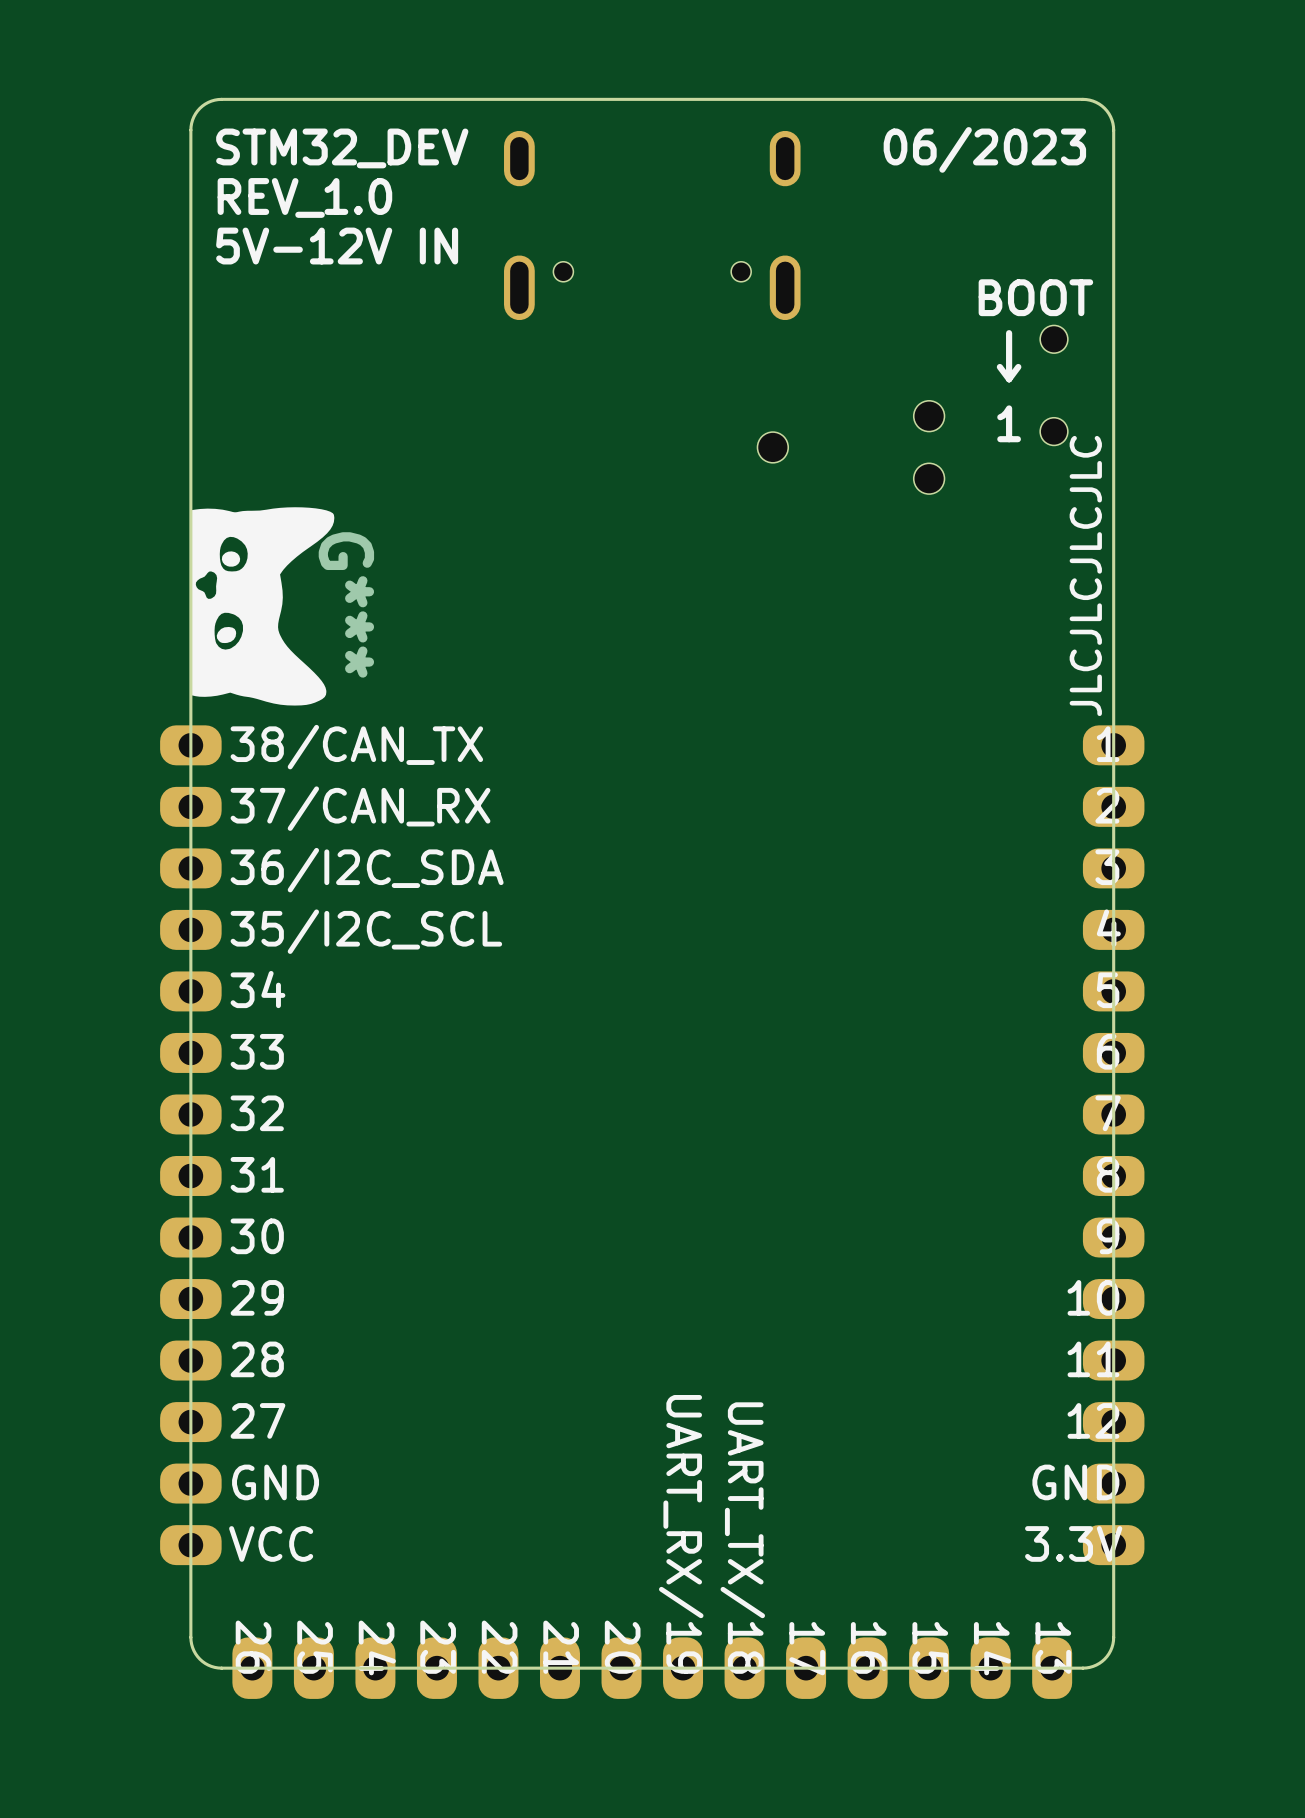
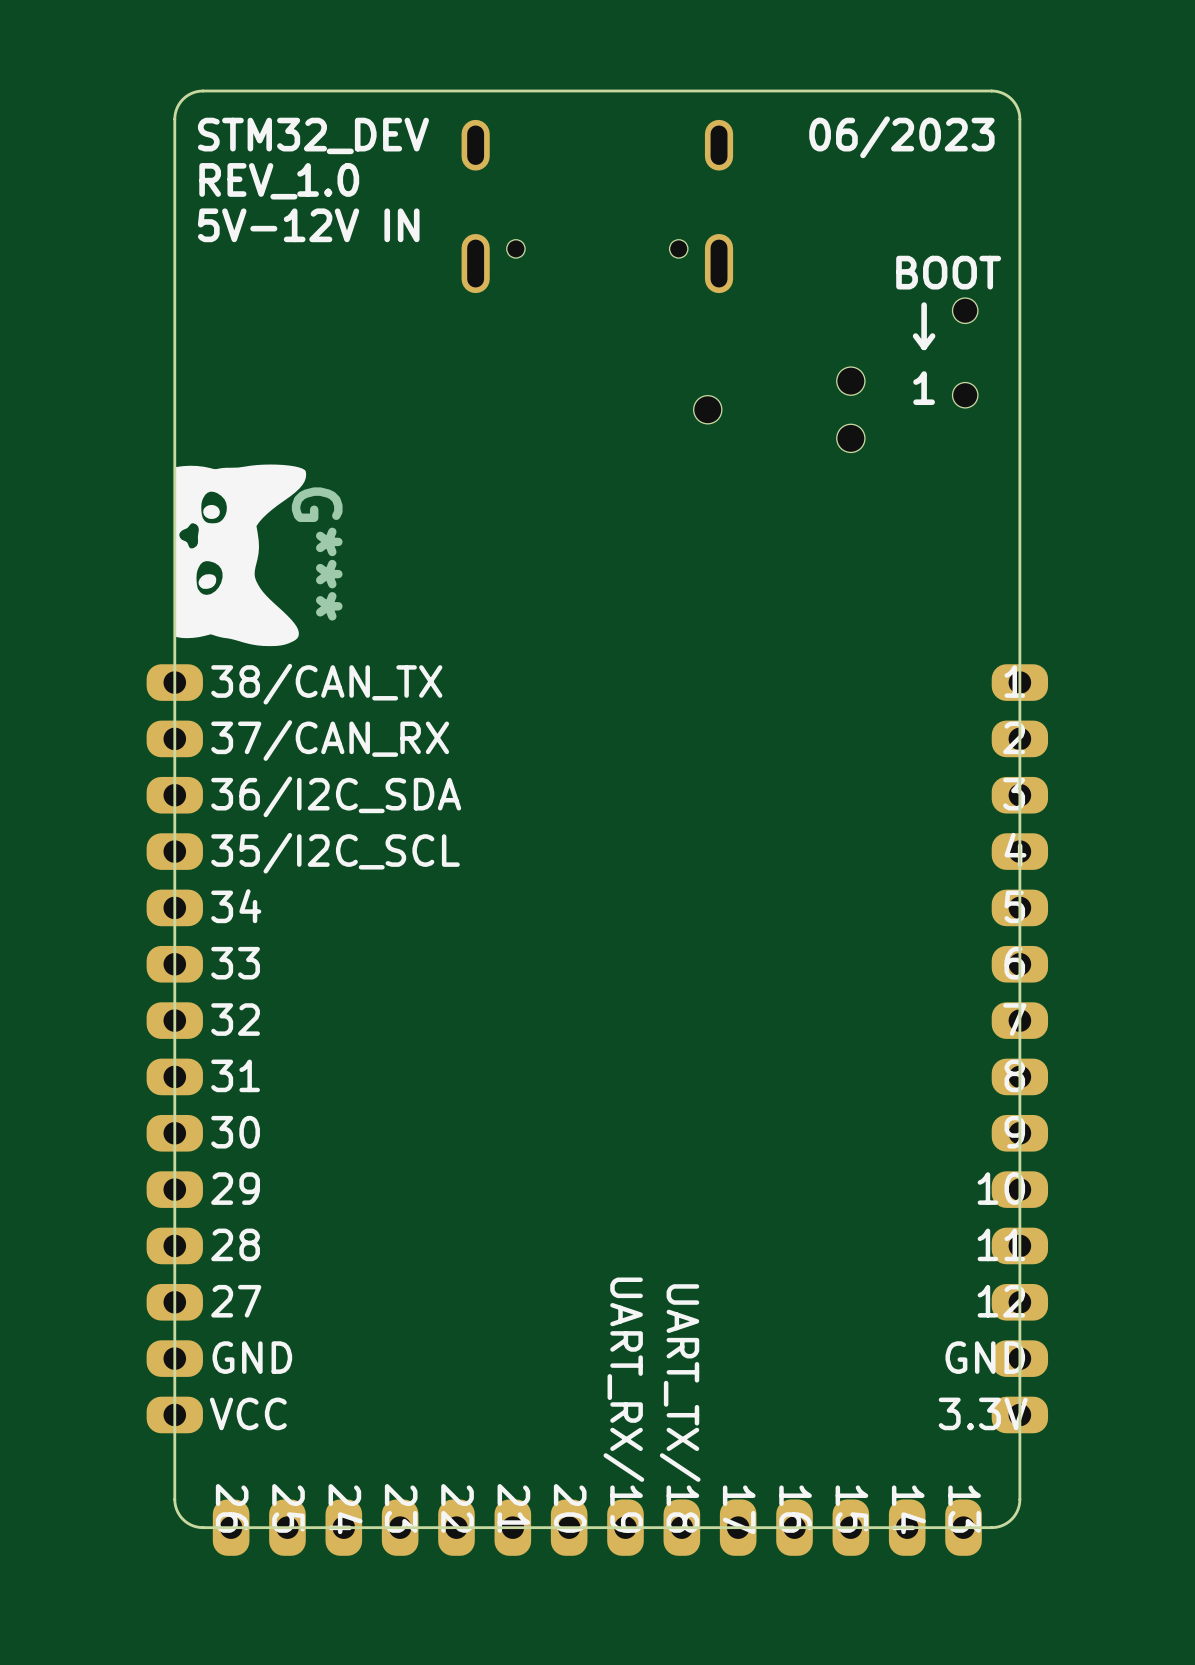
text: JLCJLCJLCJLC (1085, 575) -> none

